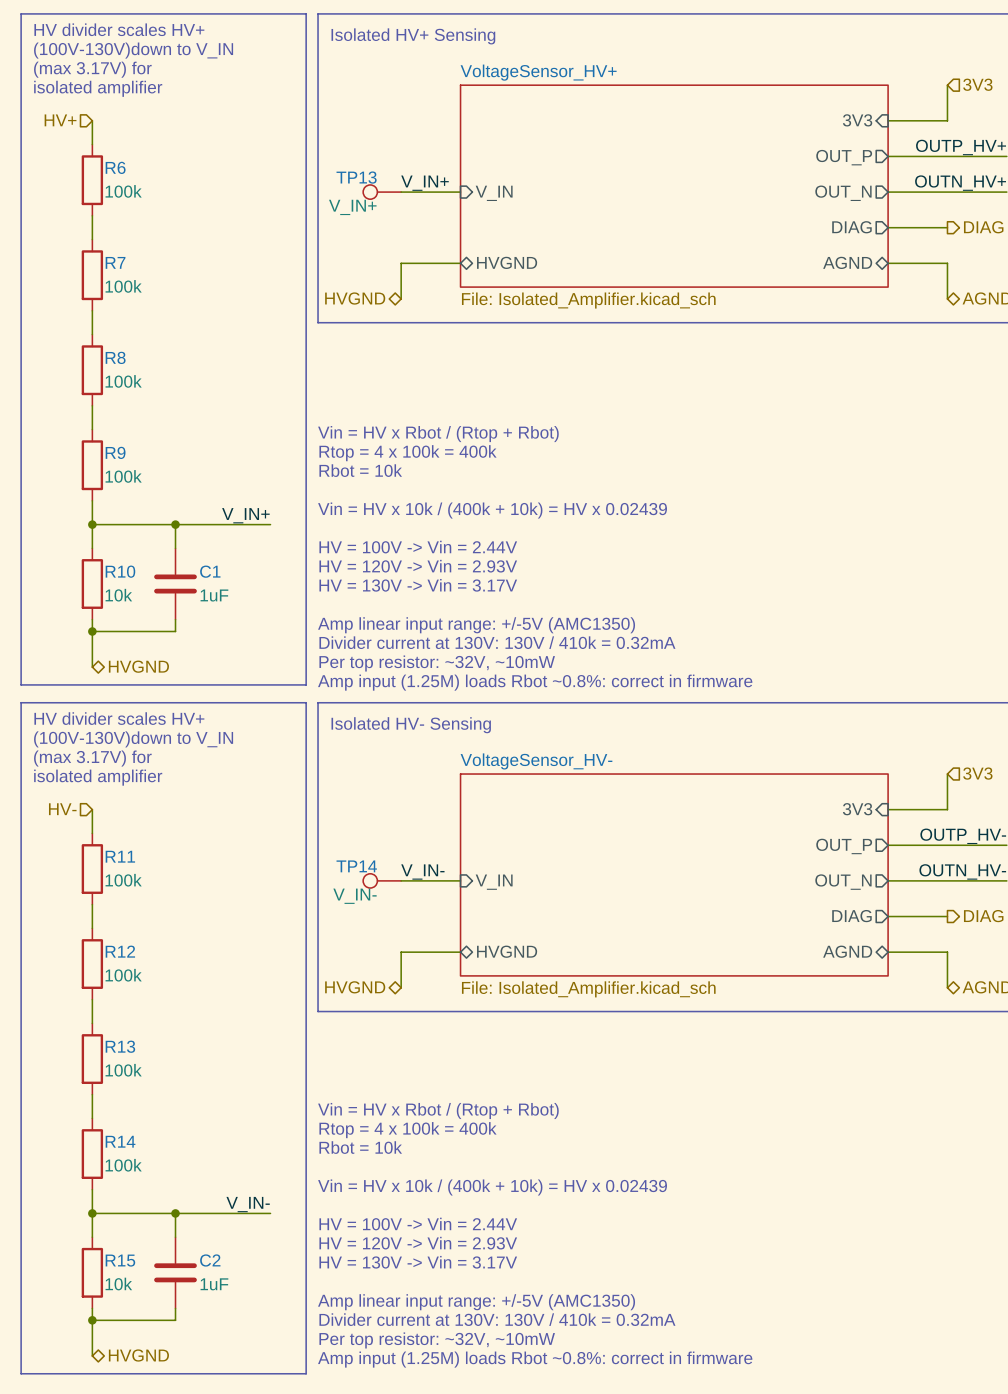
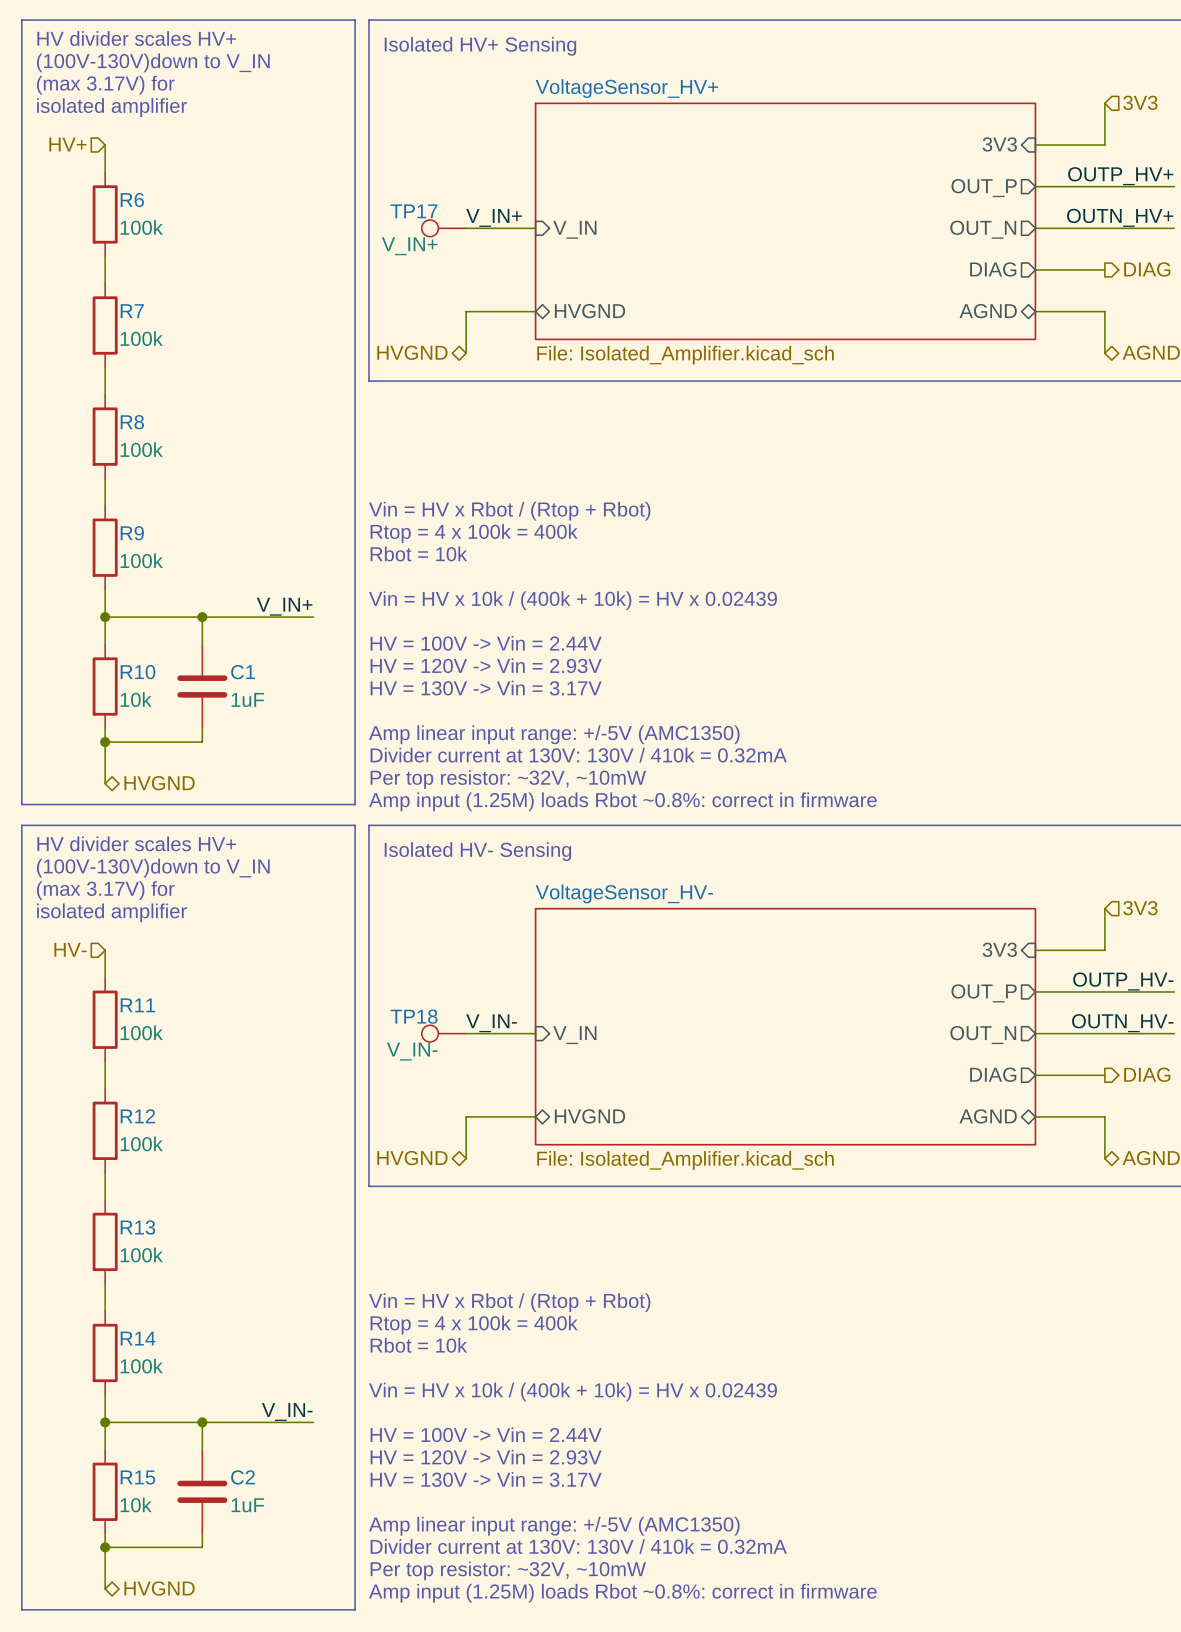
TP13 name: TP13 (356, 177) -> TP17 (413, 211)
TP14 name: TP14 (356, 866) -> TP18 (414, 1016)

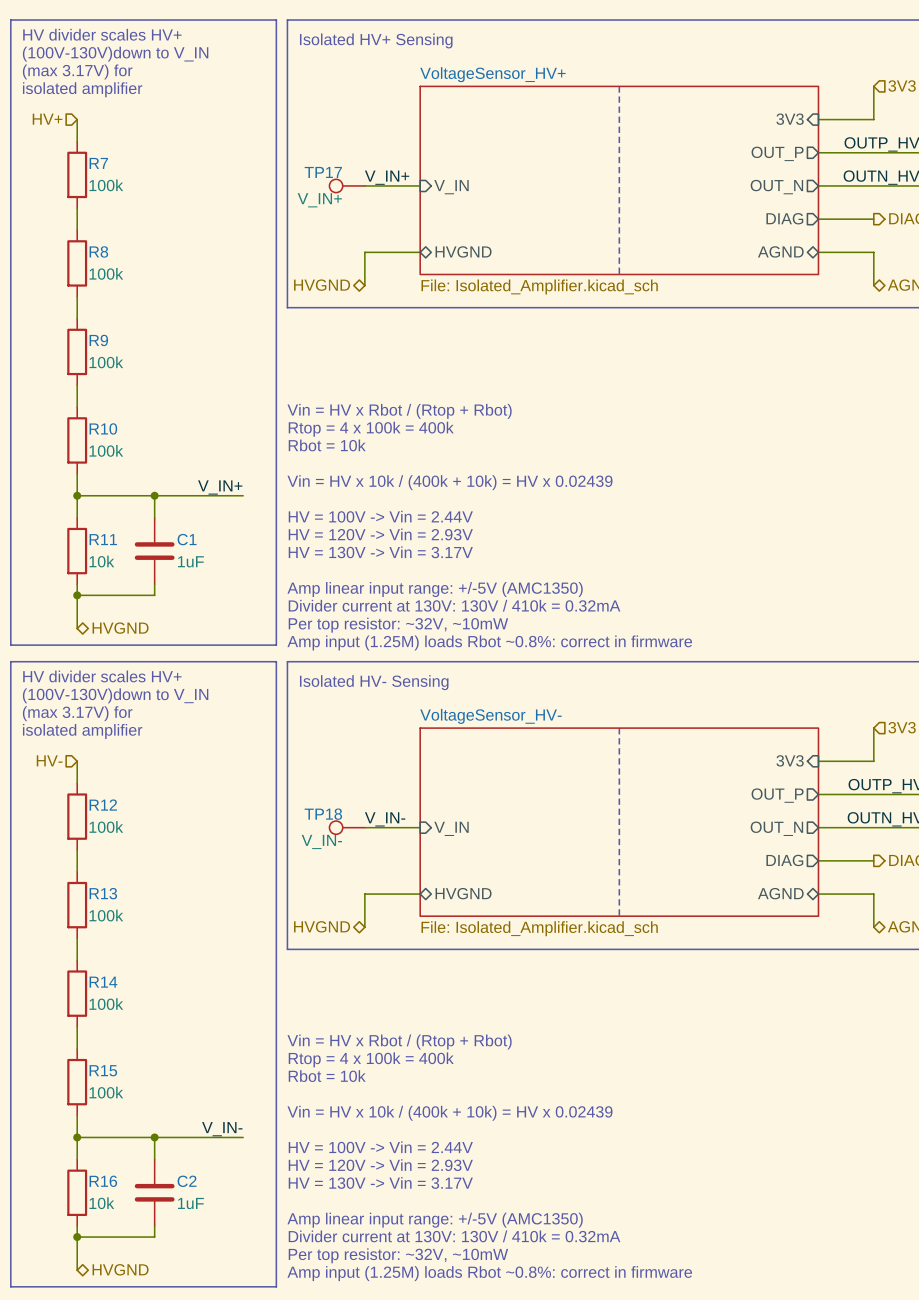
line: none -> (619, 86) (619, 274)
R6 name: R6 (132, 200) -> R7 (98, 163)
R7 name: R7 (132, 311) -> R8 (98, 251)
R8 name: R8 (132, 422) -> R9 (98, 340)
R9 name: R9 (132, 533) -> R10 (103, 428)
R10 name: R10 (137, 672) -> R11 (103, 539)
line: none -> (619, 728) (619, 916)
R11 name: R11 (137, 1005) -> R12 (103, 805)
R12 name: R12 (137, 1116) -> R13 (103, 893)
R13 name: R13 (137, 1227) -> R14 (103, 982)
R14 name: R14 (138, 1338) -> R15 (103, 1070)
R15 name: R15 (137, 1477) -> R16 (103, 1181)

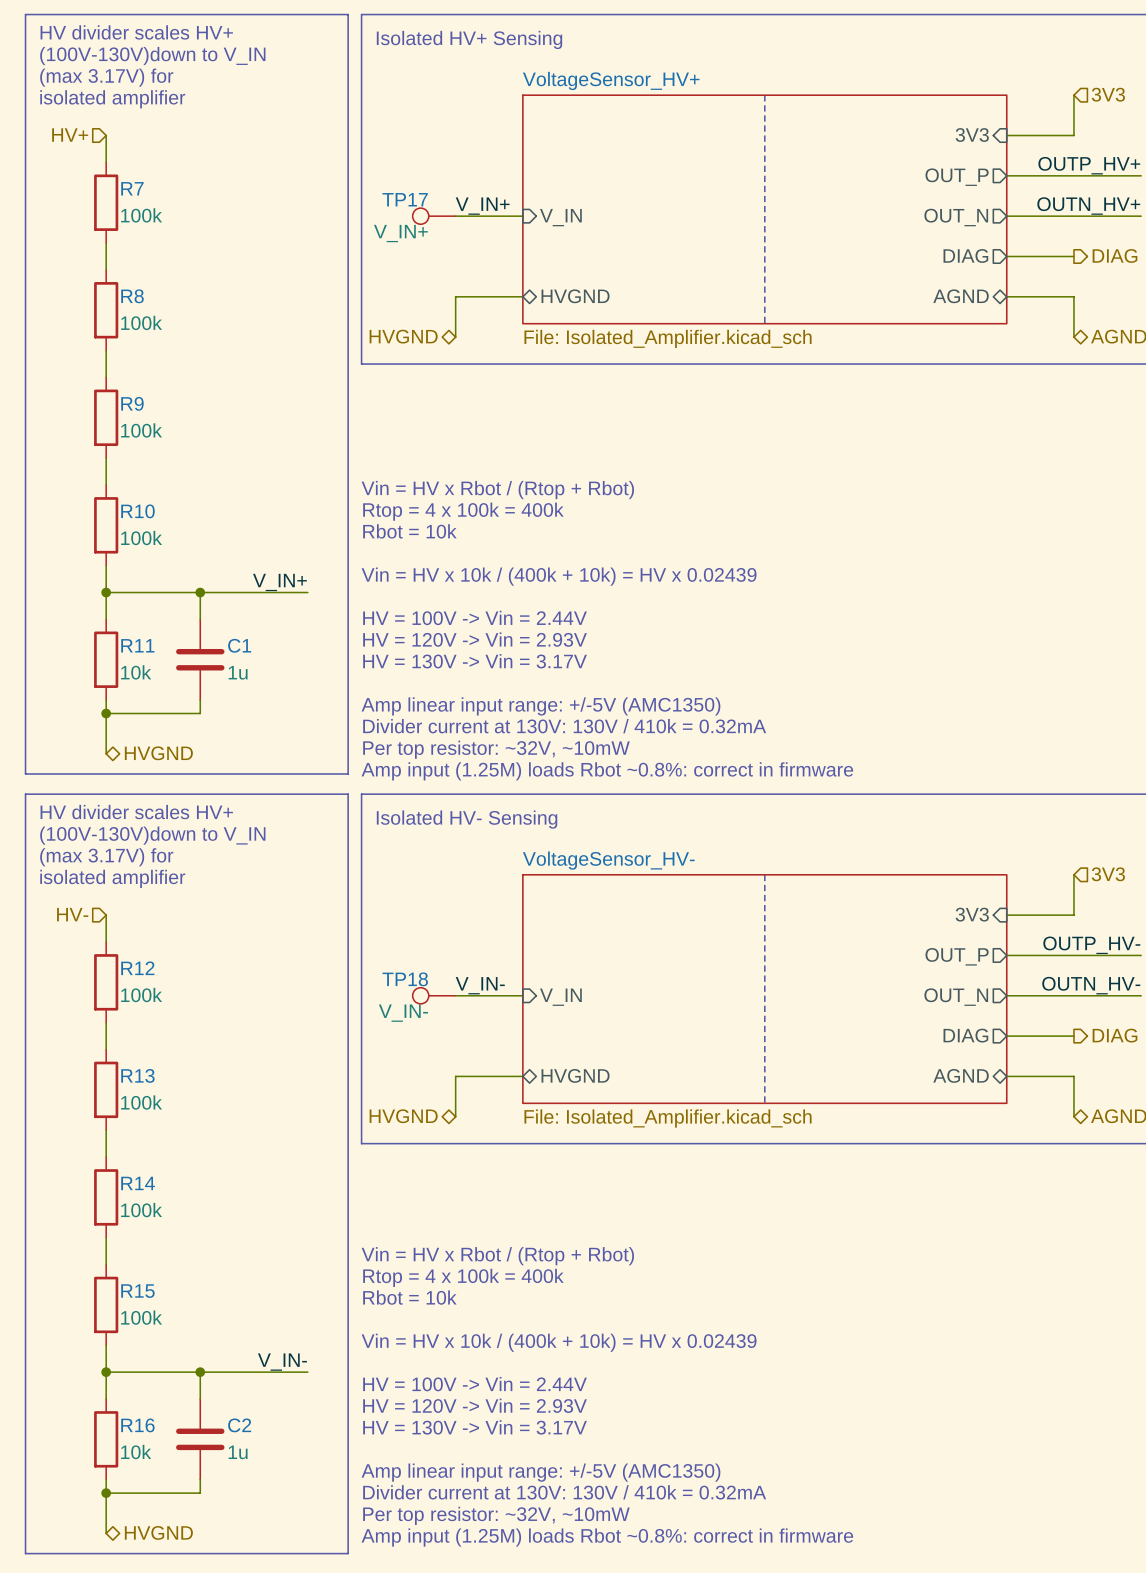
C1 value: 1uF (190, 561) -> 1u (238, 672)
C2 value: 1uF (190, 1203) -> 1u (238, 1452)

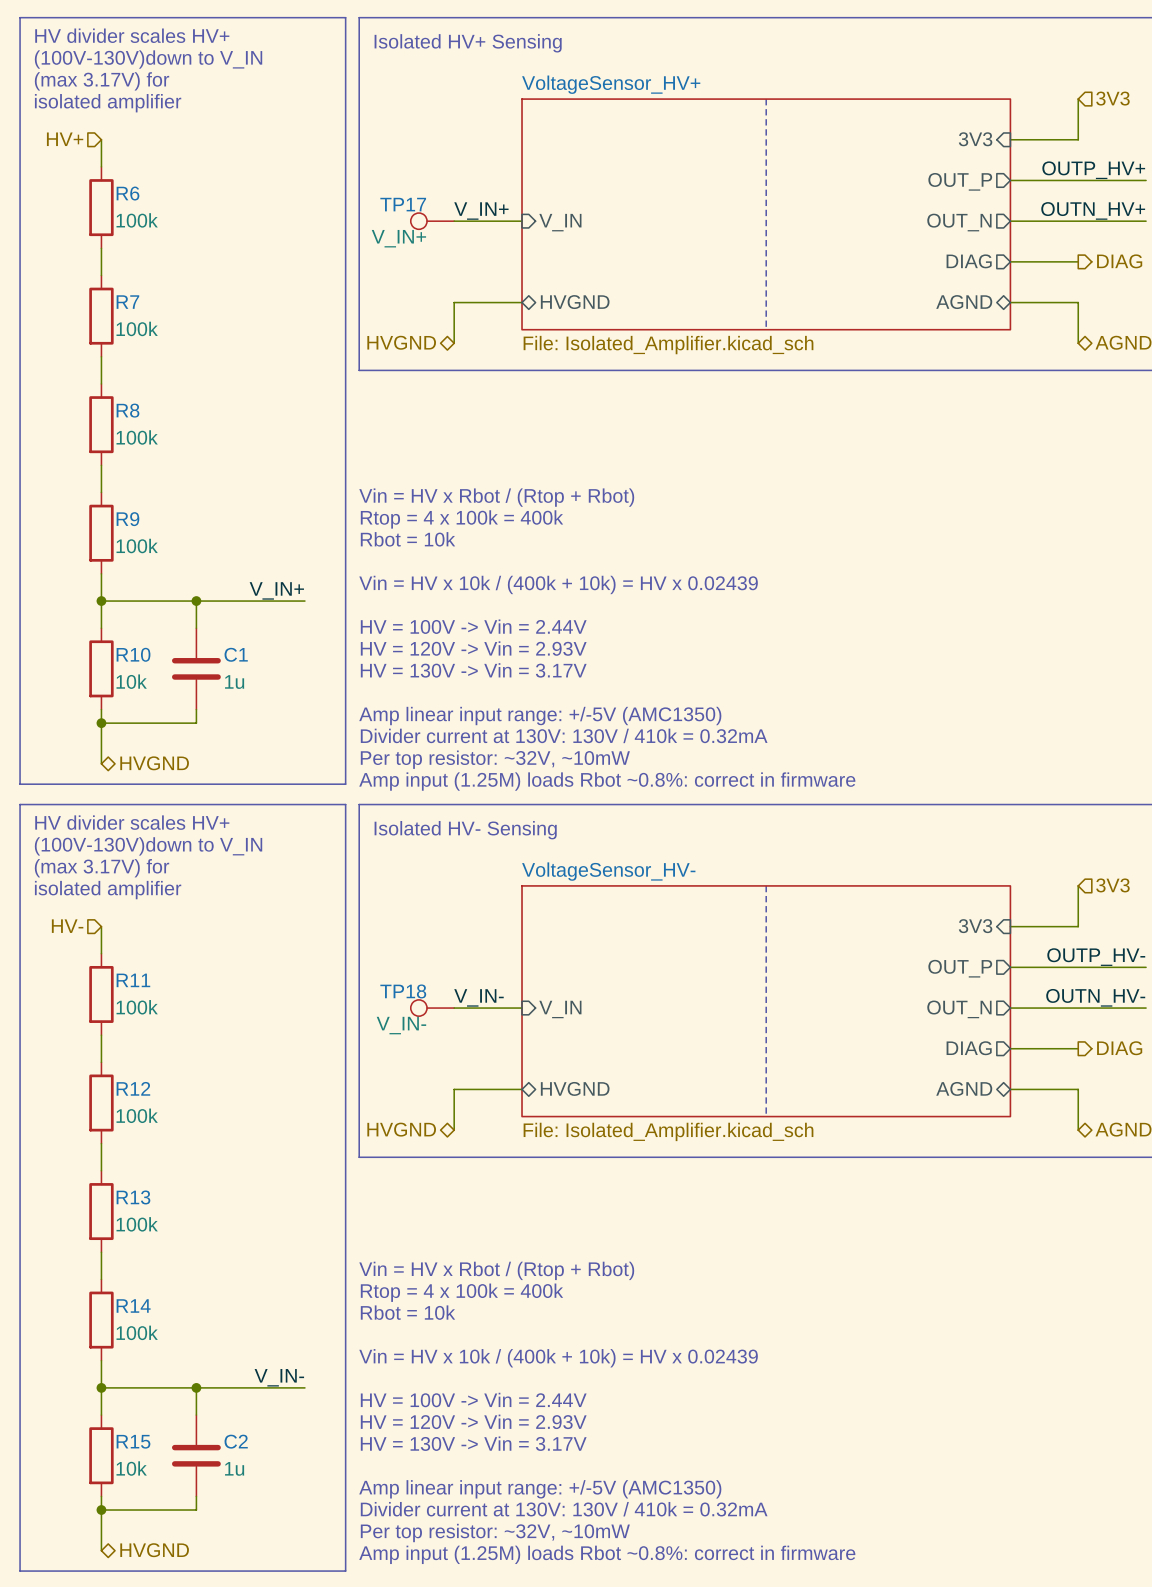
R7 name: R7 (132, 188) -> R6 (127, 193)
R8 name: R8 (132, 296) -> R7 (127, 302)
R9 name: R9 (132, 403) -> R8 (127, 410)
R10 name: R10 (137, 511) -> R9 (127, 519)
R11 name: R11 (137, 645) -> R10 (133, 654)
R12 name: R12 (137, 968) -> R11 (133, 980)
R13 name: R13 (137, 1075) -> R12 (133, 1088)
R14 name: R14 (138, 1183) -> R13 (133, 1197)
R15 name: R15 (137, 1291) -> R14 (133, 1306)
R16 name: R16 (137, 1425) -> R15 (133, 1441)

